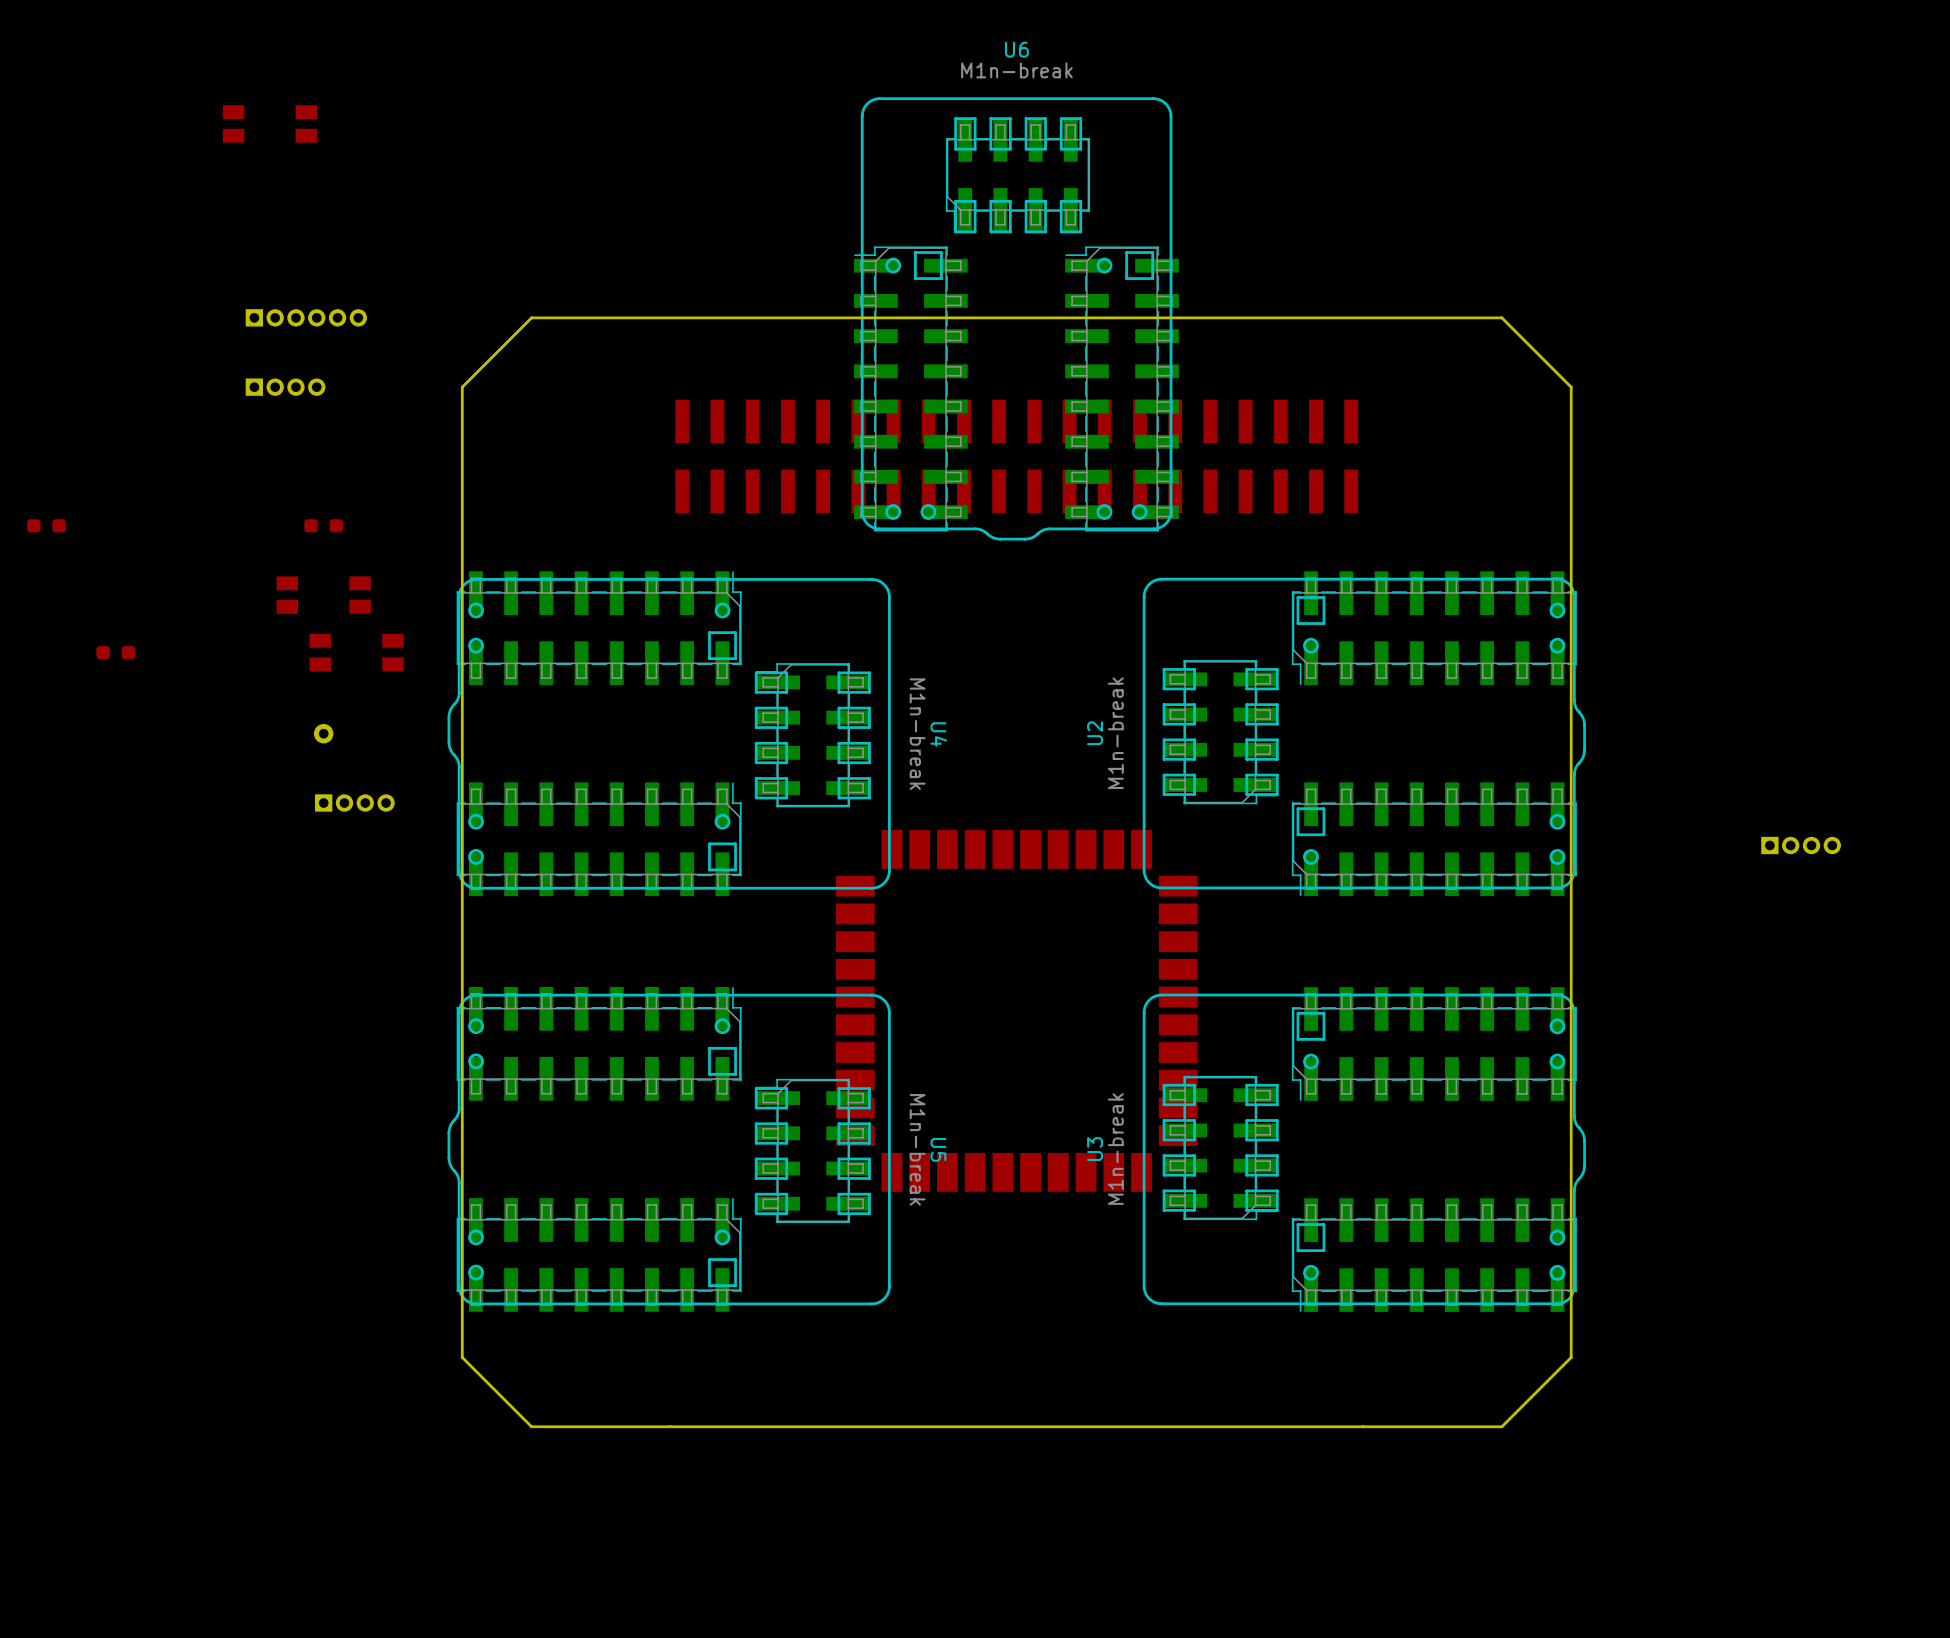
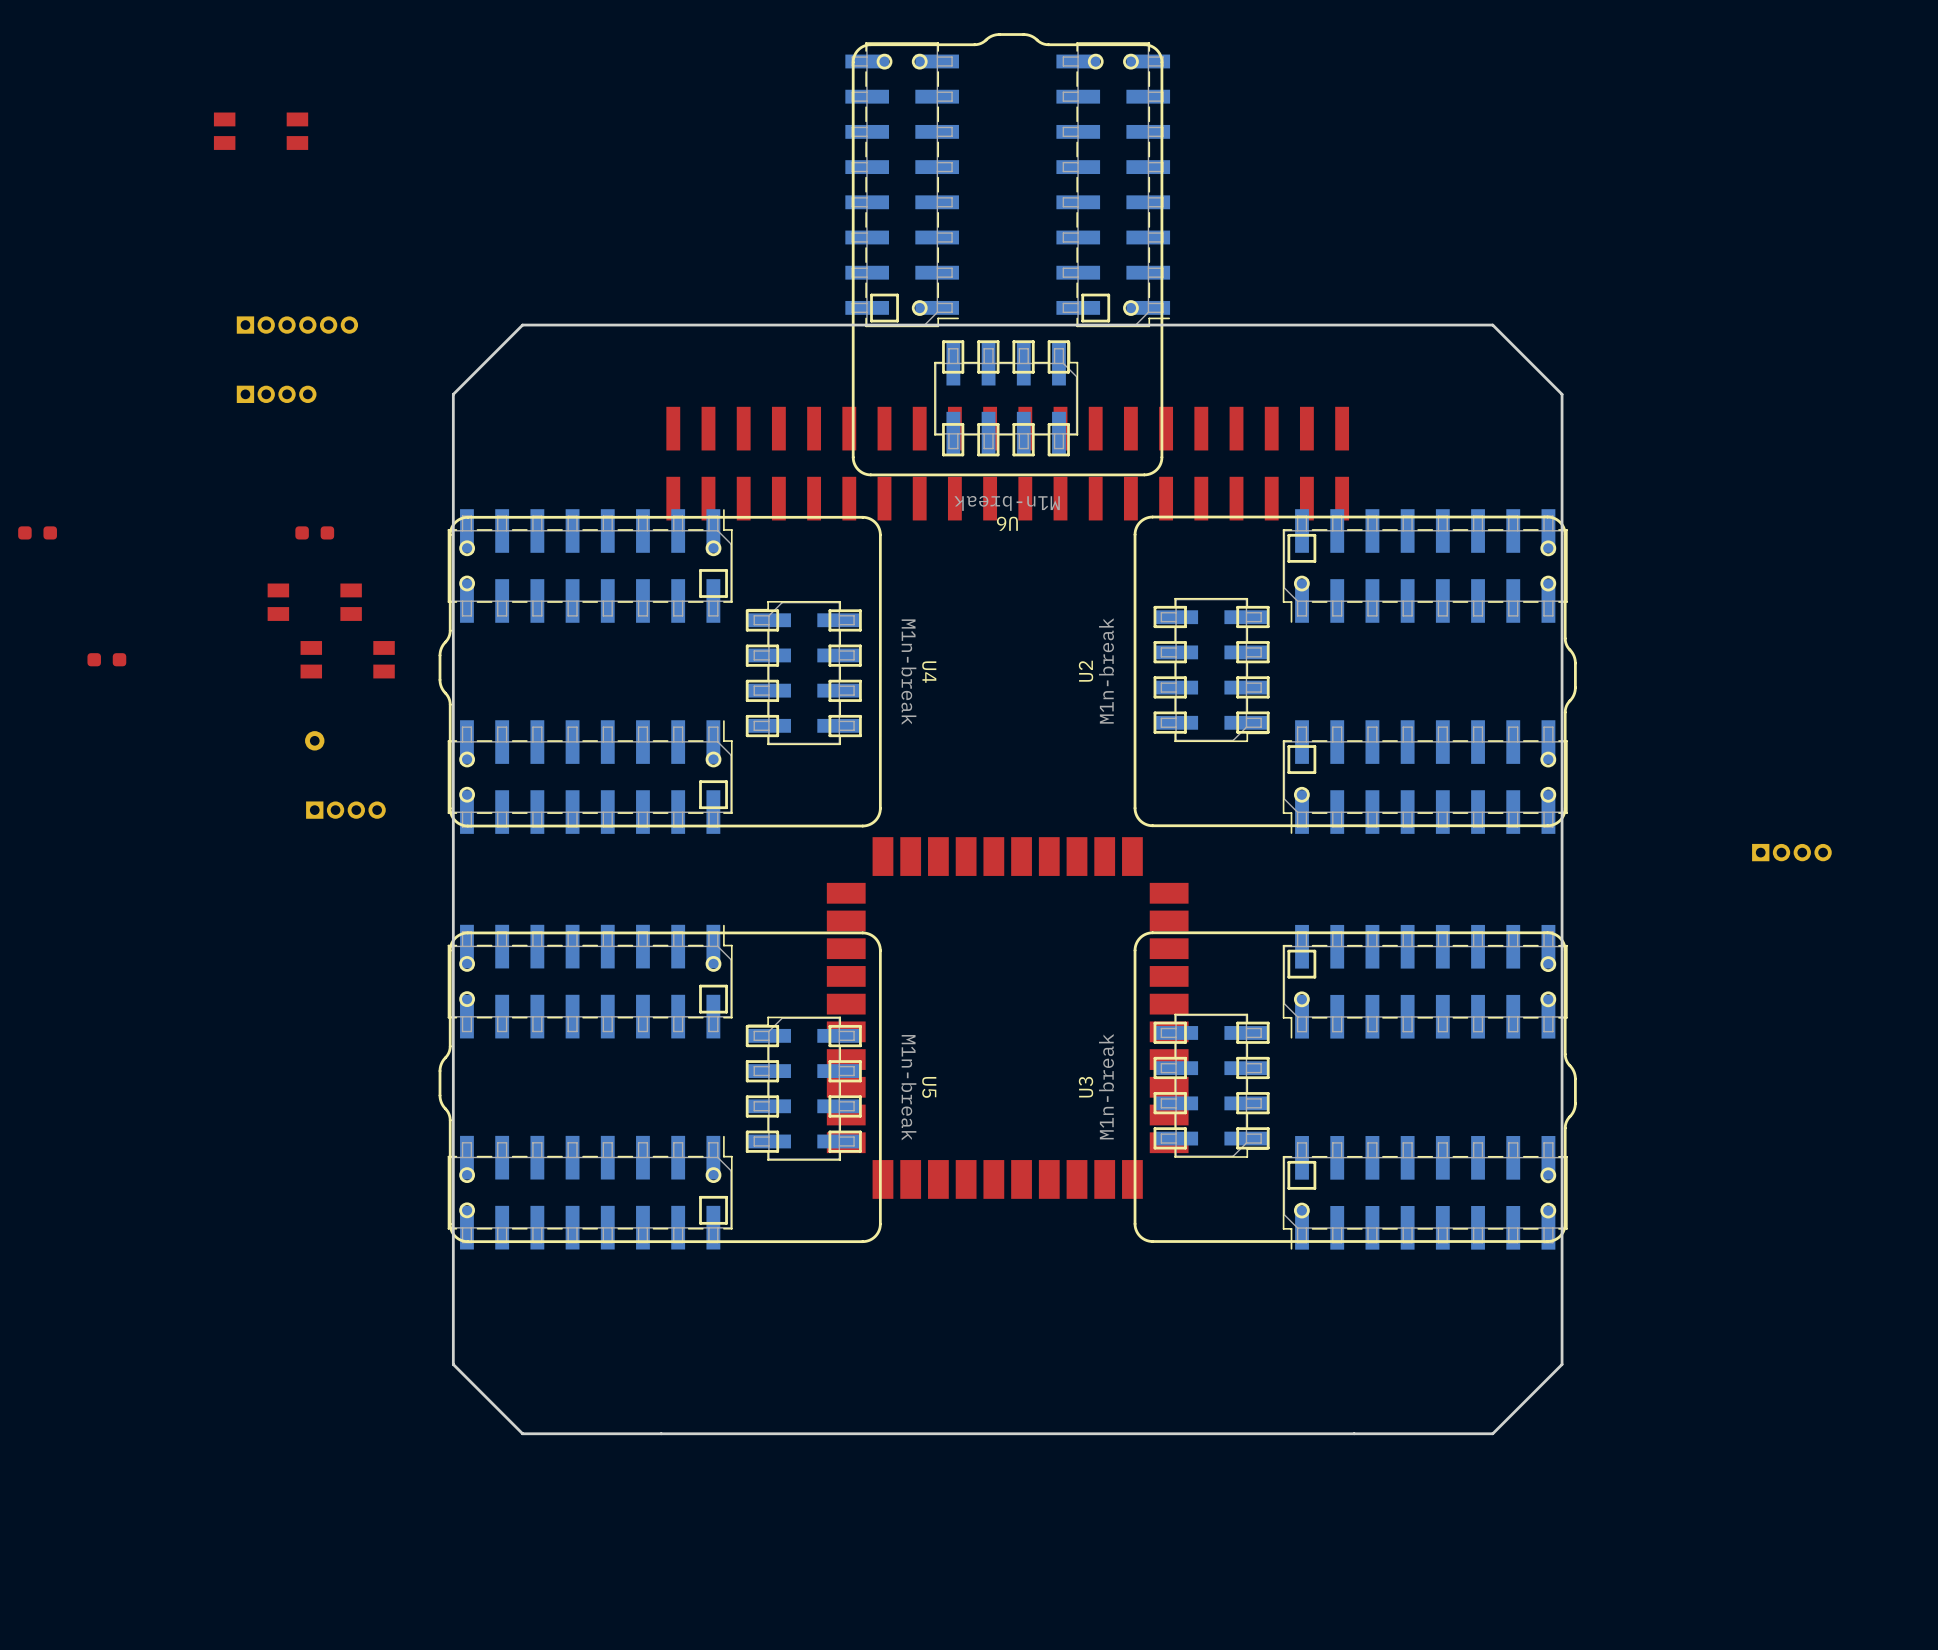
U6 name position: U6 (1016, 49) -> U6 (1007, 523)
U6 value position: M1n-break (1016, 70) -> M1n-break (1007, 503)
U6 footprint: [854, 97, 1179, 541] -> [845, 33, 1171, 477]
U4 footprint: [447, 571, 891, 897] -> [438, 509, 882, 834]
U2 footprint: [1142, 571, 1586, 897] -> [1133, 509, 1577, 834]
U5 footprint: [447, 987, 891, 1312] -> [438, 924, 882, 1250]
U3 footprint: [1142, 987, 1586, 1312] -> [1133, 924, 1577, 1250]

